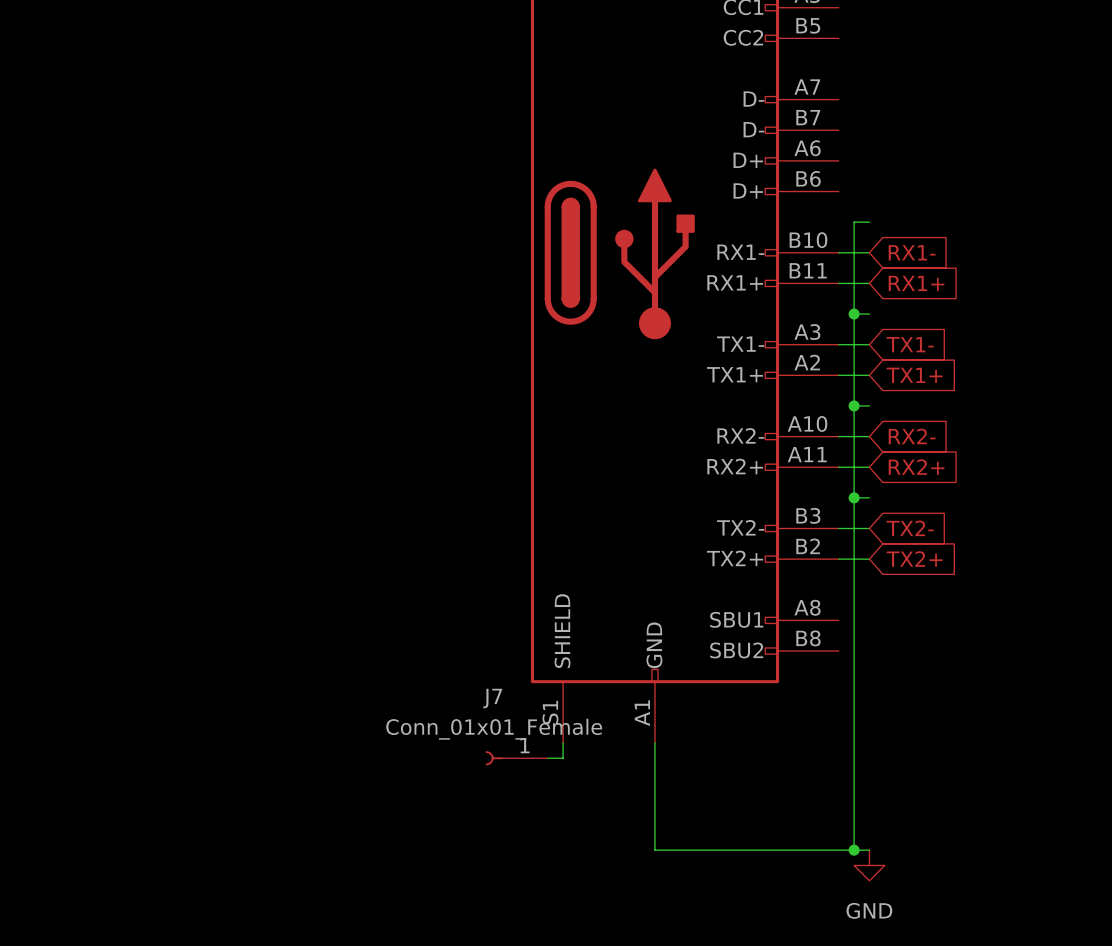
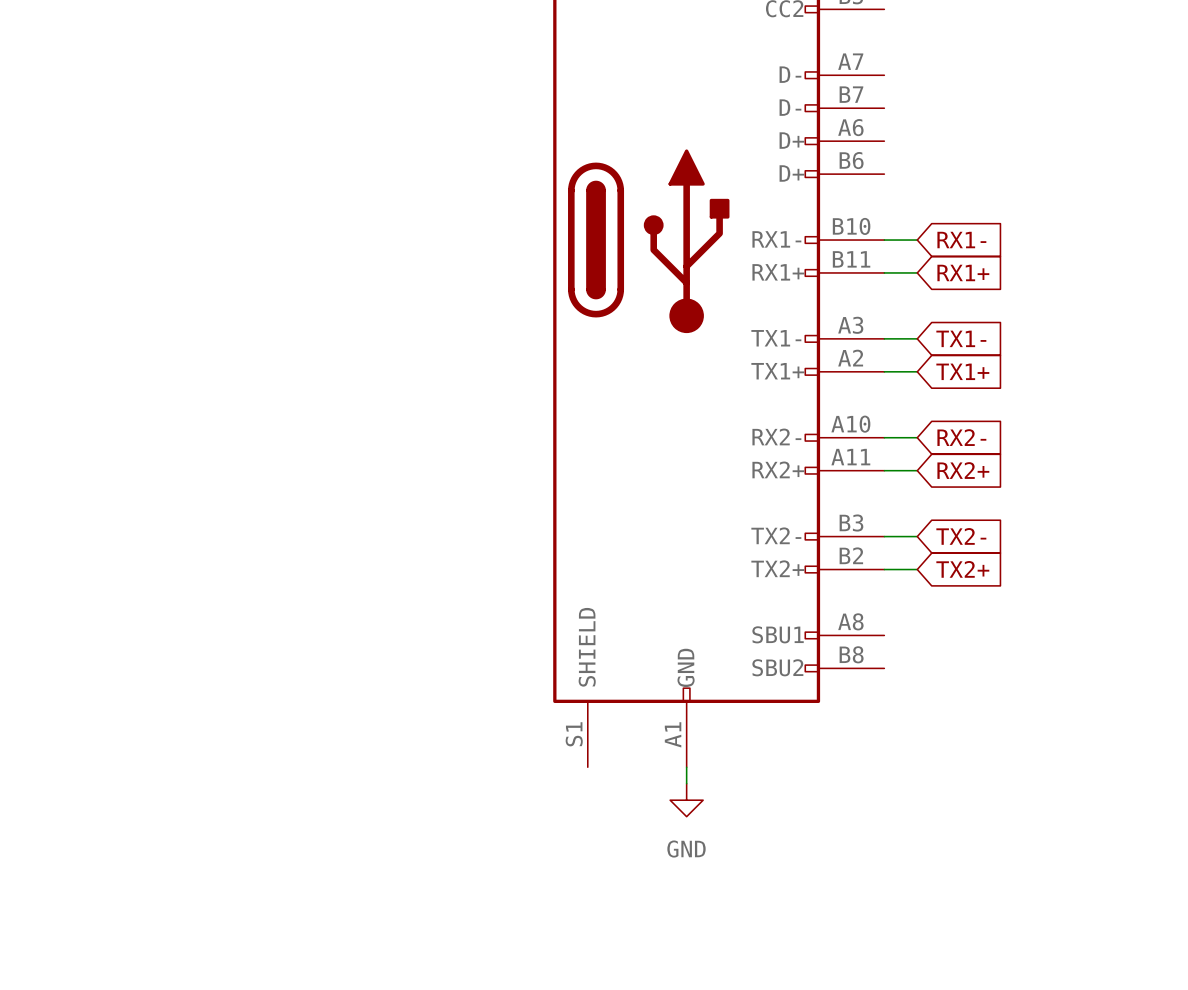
wire: (869, 222) (854, 222) (854, 850) -> none
wire: (854, 314) (869, 314) -> none
junction: (854, 314) -> none
wire: (854, 405) (869, 405) -> none
junction: (854, 405) -> none
wire: (854, 497) (869, 497) -> none
junction: (854, 497) -> none
wire: (563, 742) (563, 758) (547, 758) -> none
J7: Conn_01x01_Female (516, 758) -> none
wire: (654, 758) (654, 850) (869, 850) -> none
junction: (854, 850) -> none
power symbol position: GND (869, 865) -> GND (686, 800)

